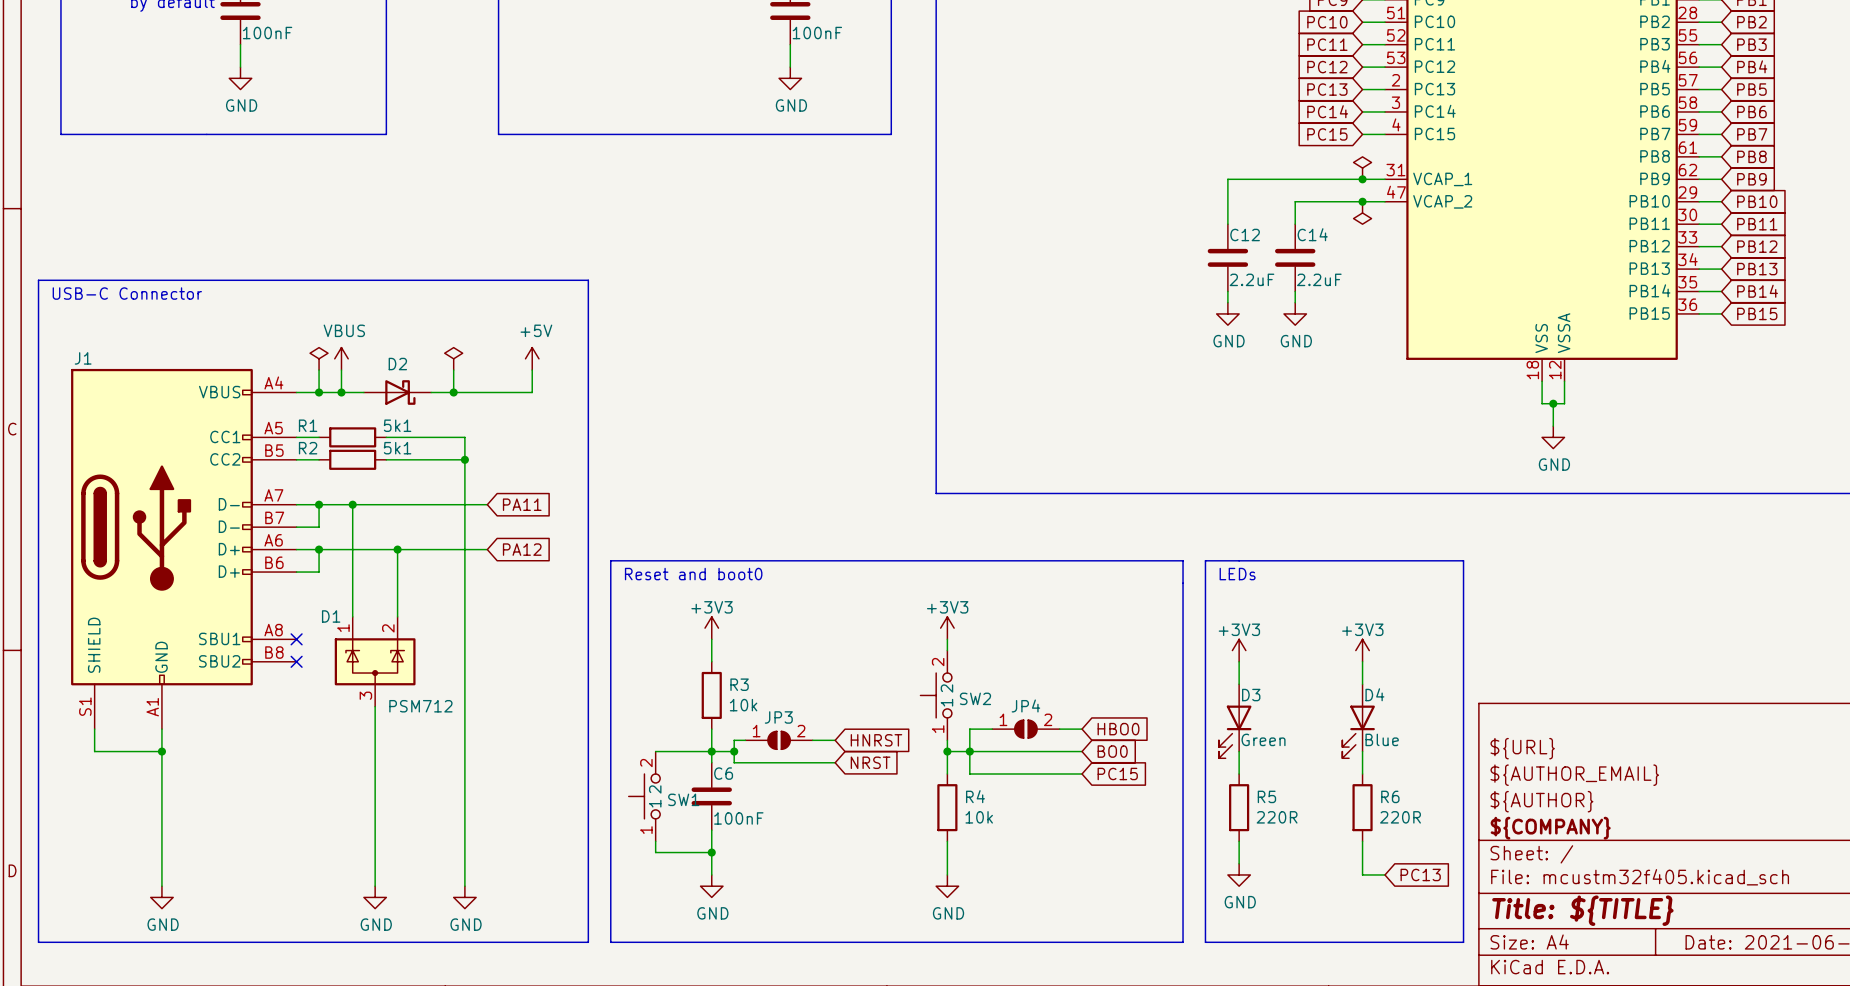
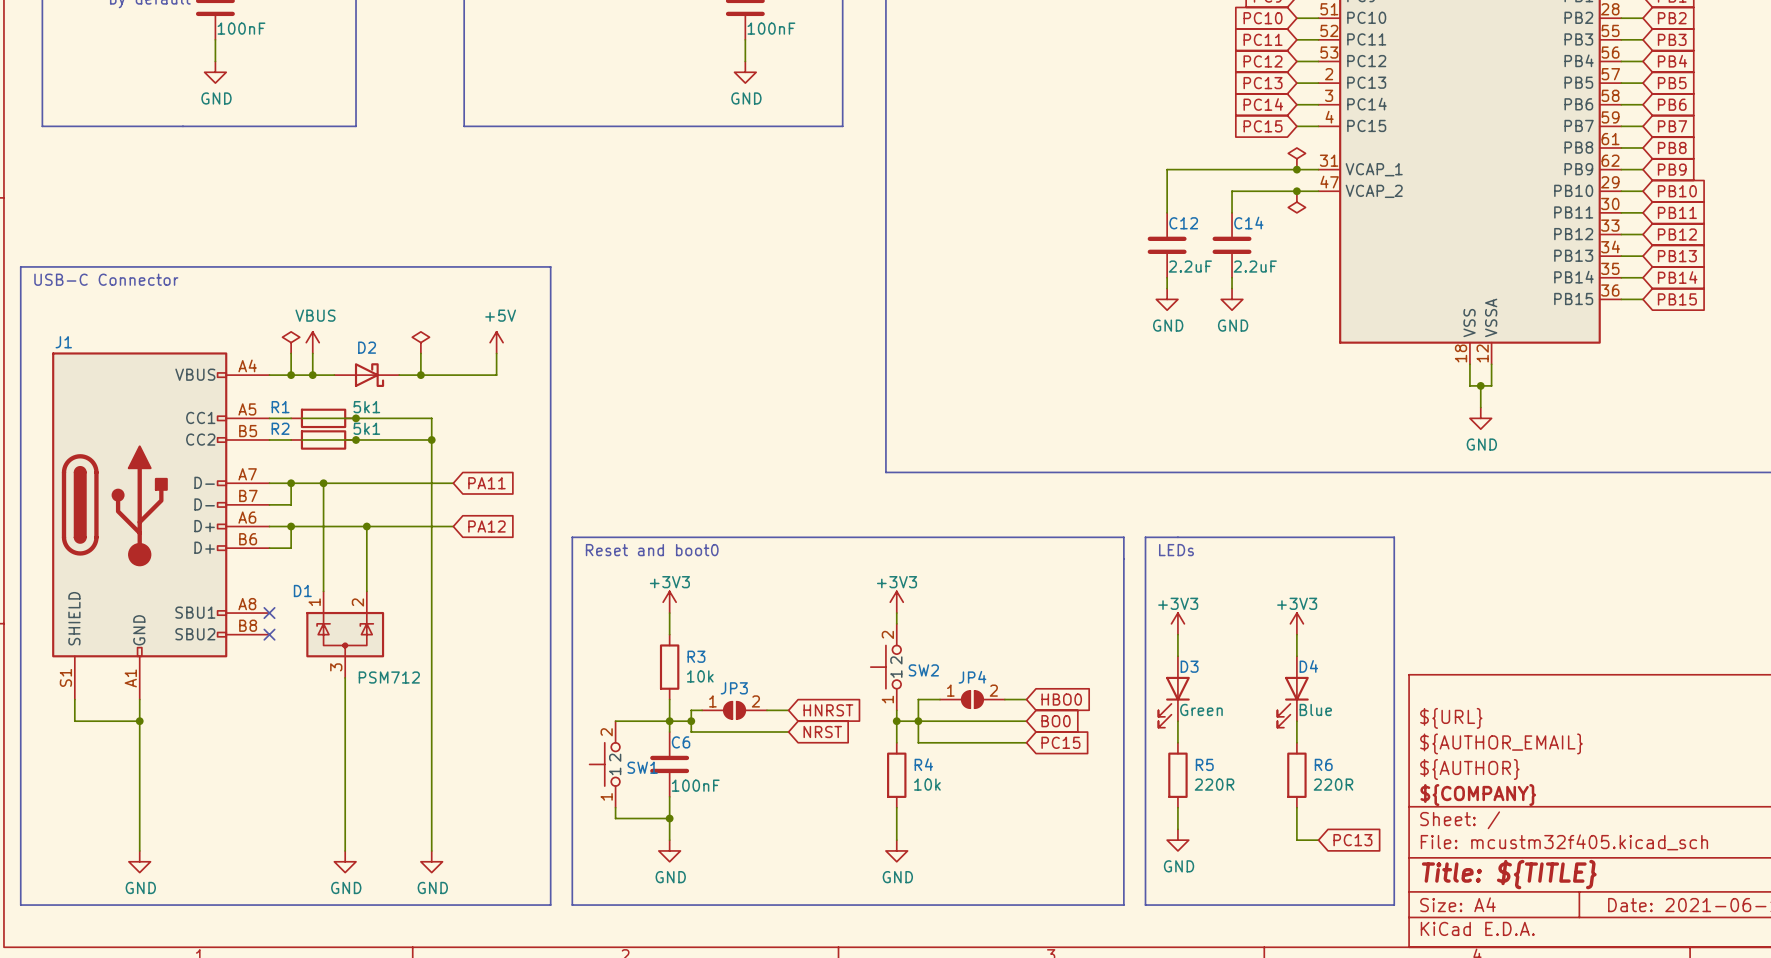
wire: none -> (301, 418) (356, 418)
junction: none -> (356, 418)
wire: none -> (301, 439) (356, 439)
junction: none -> (356, 439)

